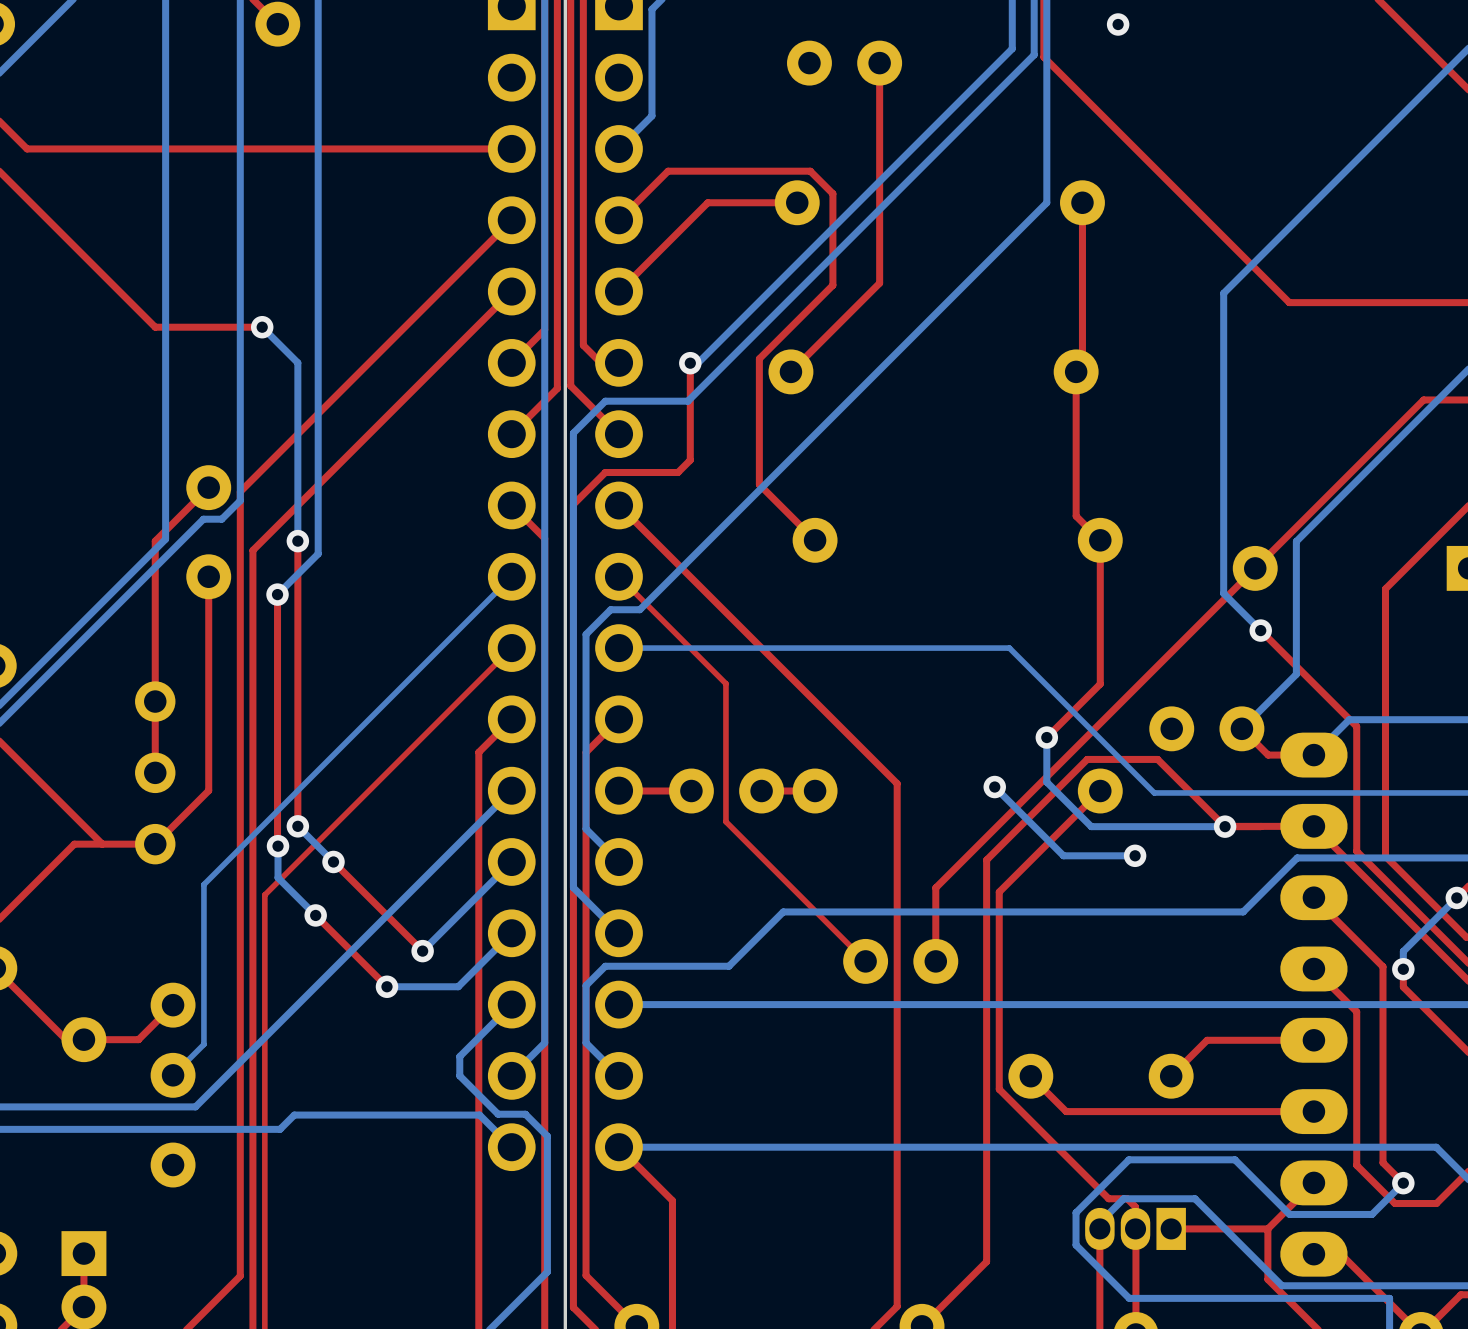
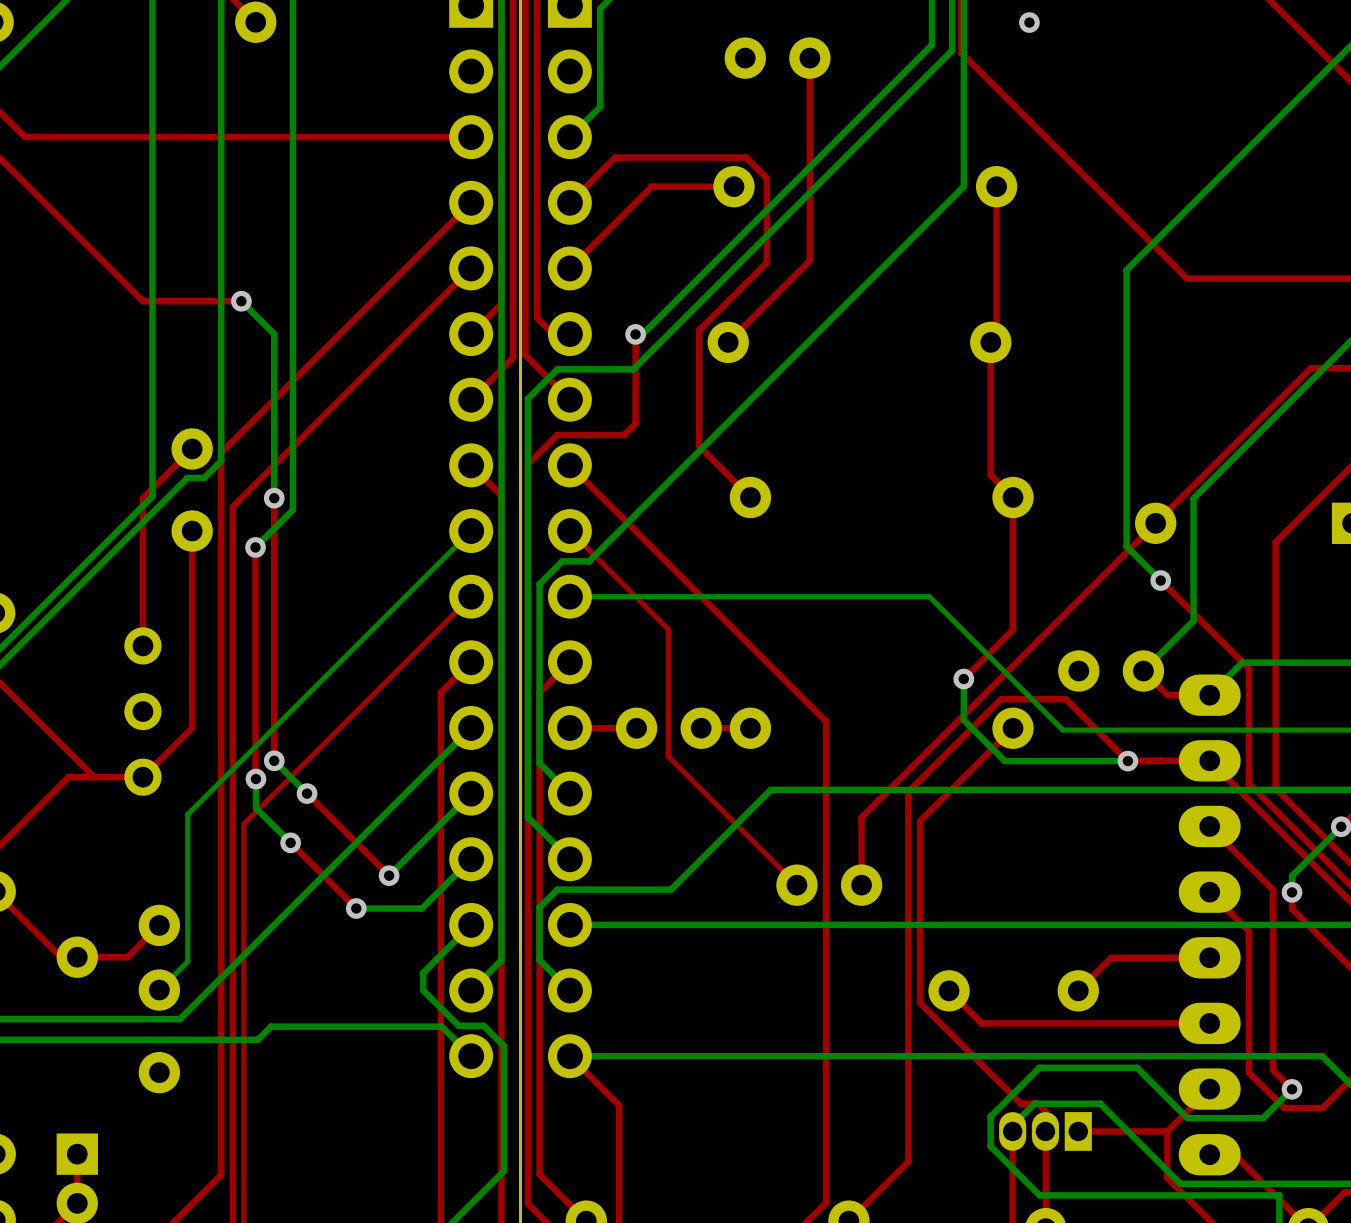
top track: (155, 701) (155, 772) -> none
bottom track: (994, 787) (1063, 855) (1135, 855) -> none
via: (994, 787) -> none
via: (1135, 855) -> none
bottom track: (1297, 857) (1243, 911) (783, 911) -> (1194, 789) (770, 789) (721, 839)

